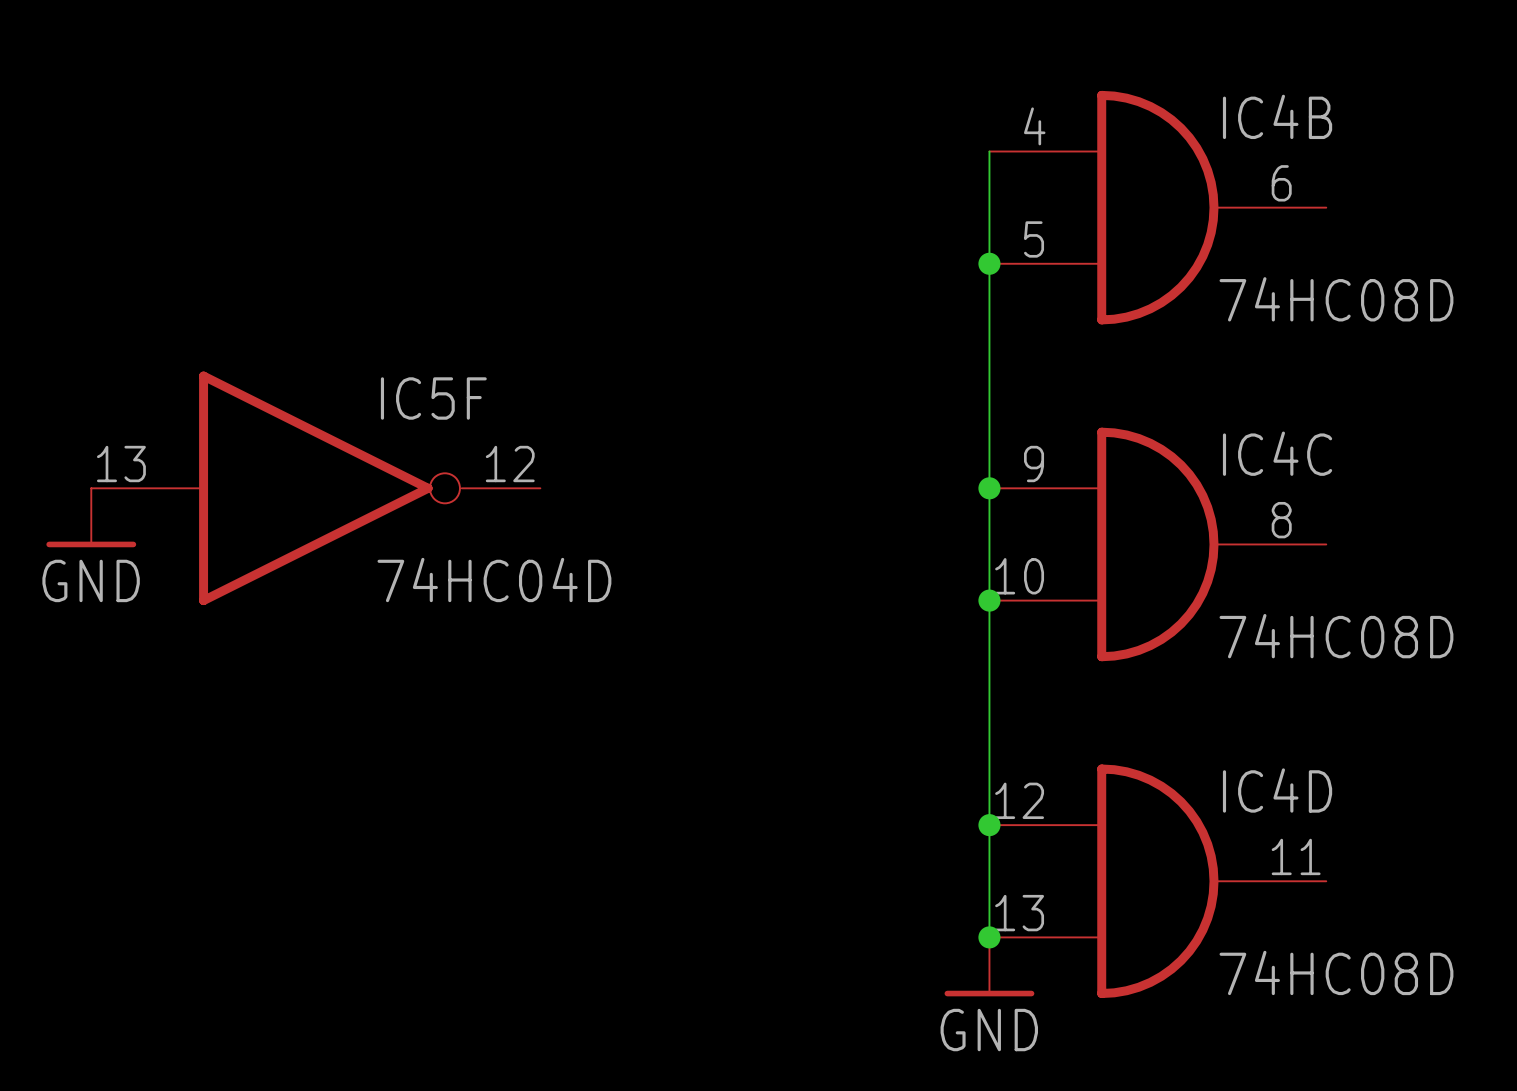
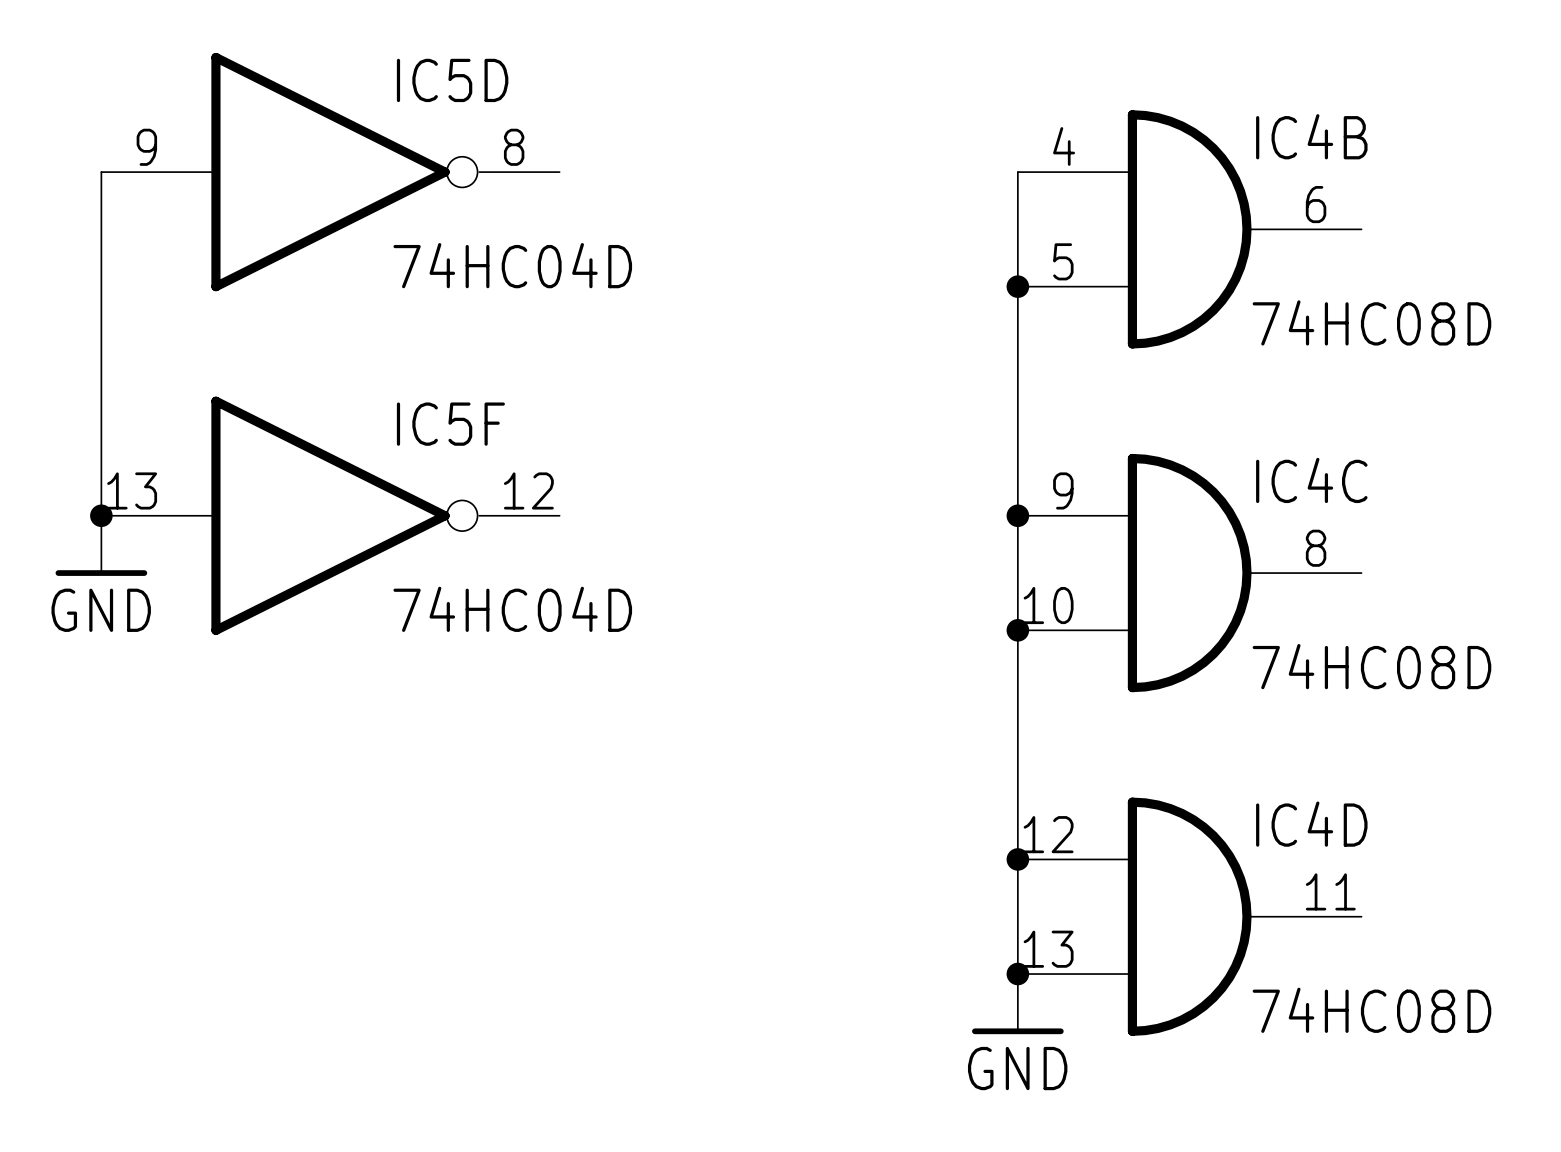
wire: none -> (101, 172) (101, 515)
IC5D: none -> 74HC04D (330, 172)
junction: none -> (101, 515)

